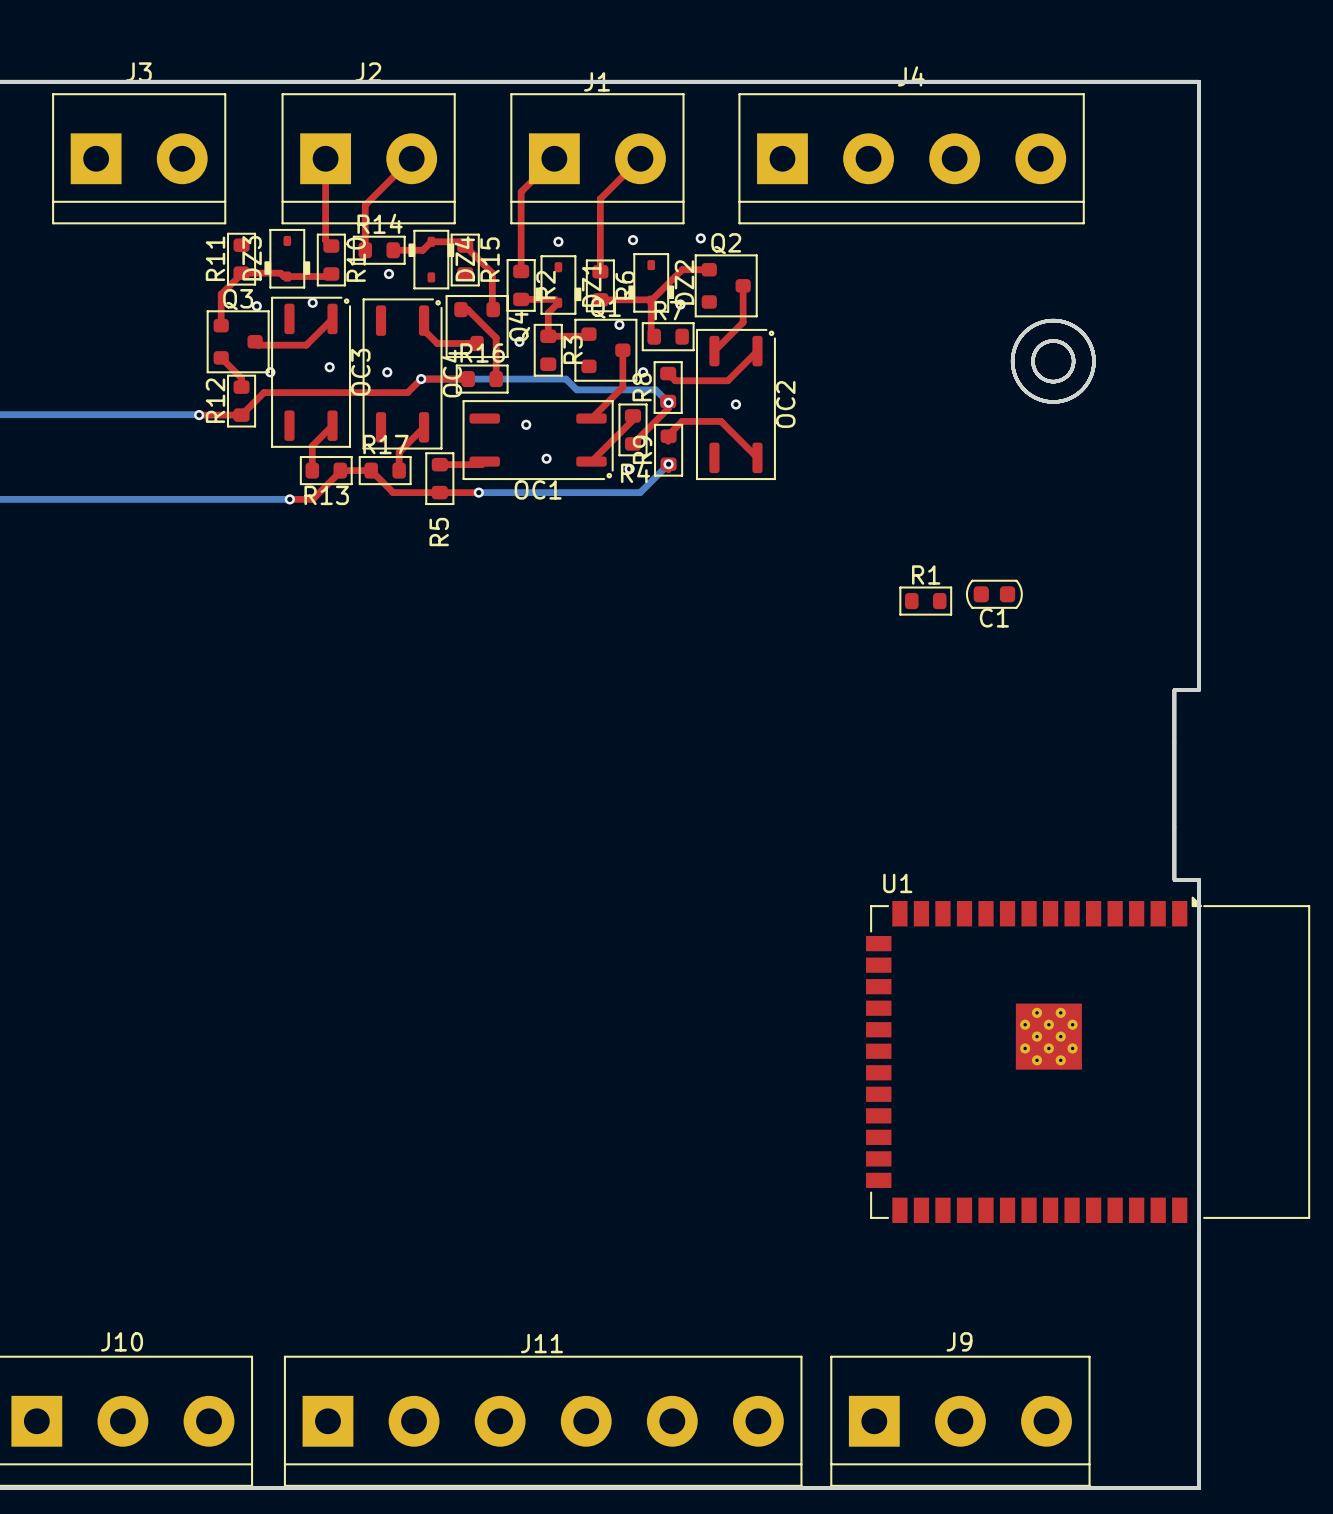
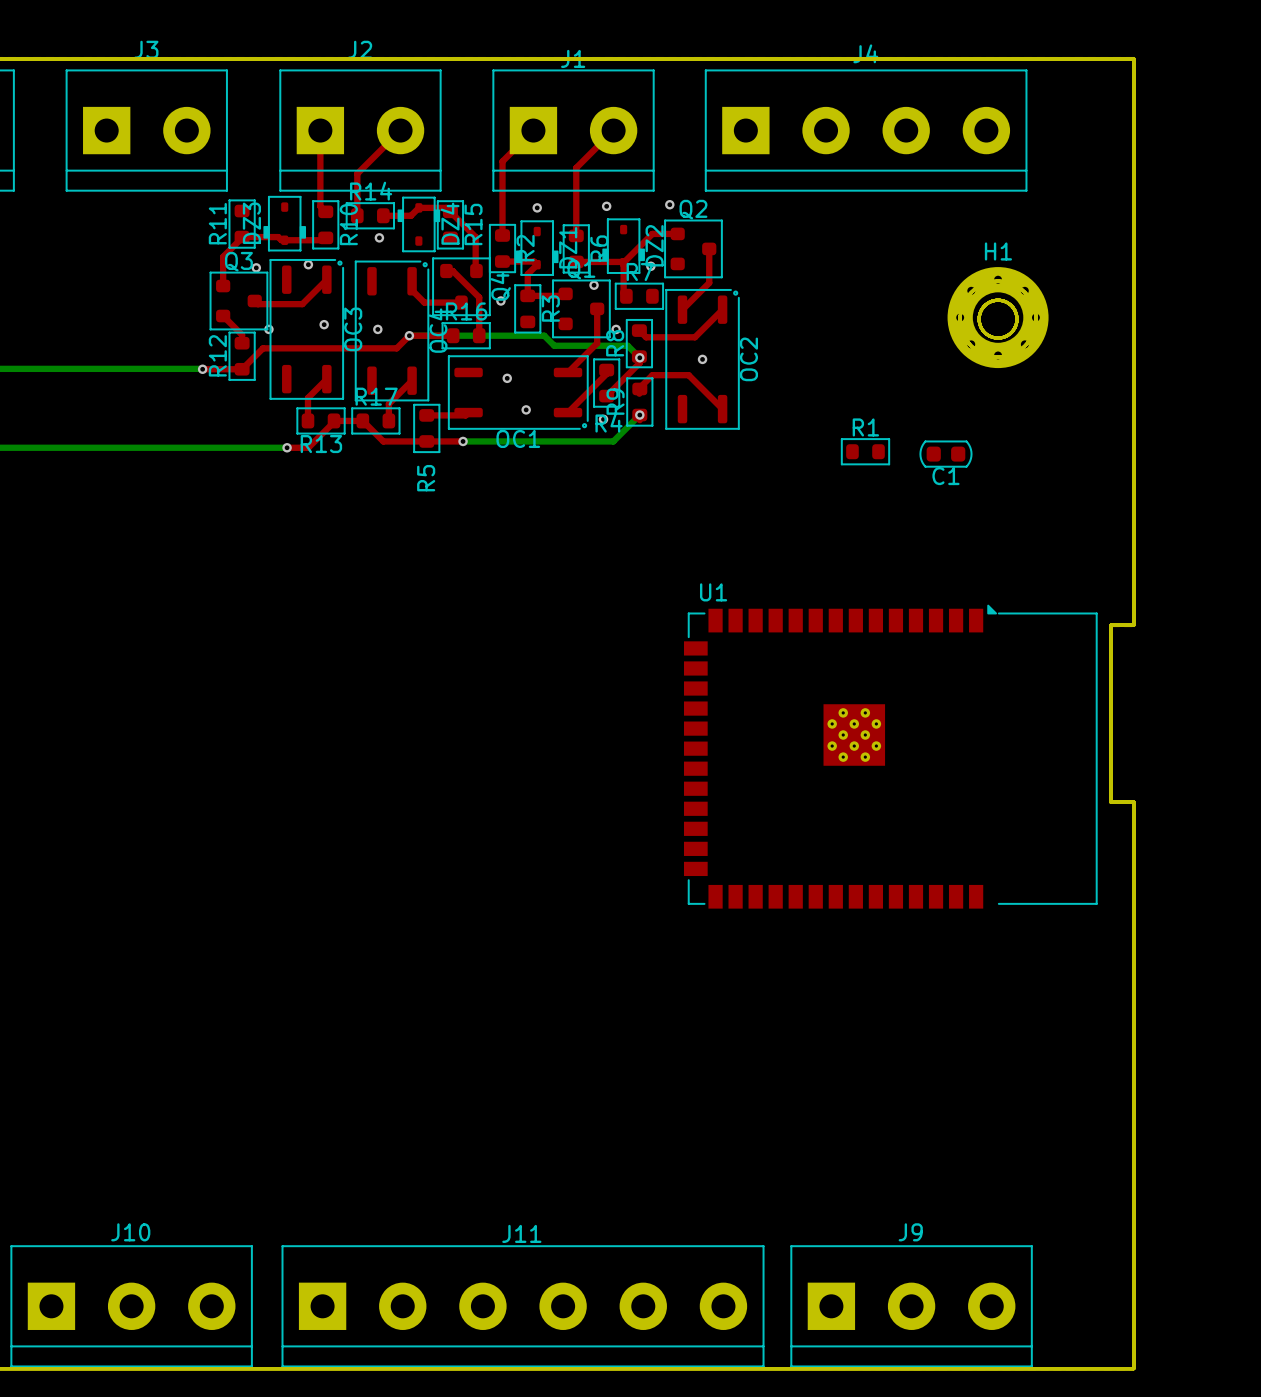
H1: none -> (998, 317)
C1 position: (994, 594) -> (945, 454)
R1 position: (925, 601) -> (865, 451)
U1 position: (1088, 1059) -> (890, 756)

